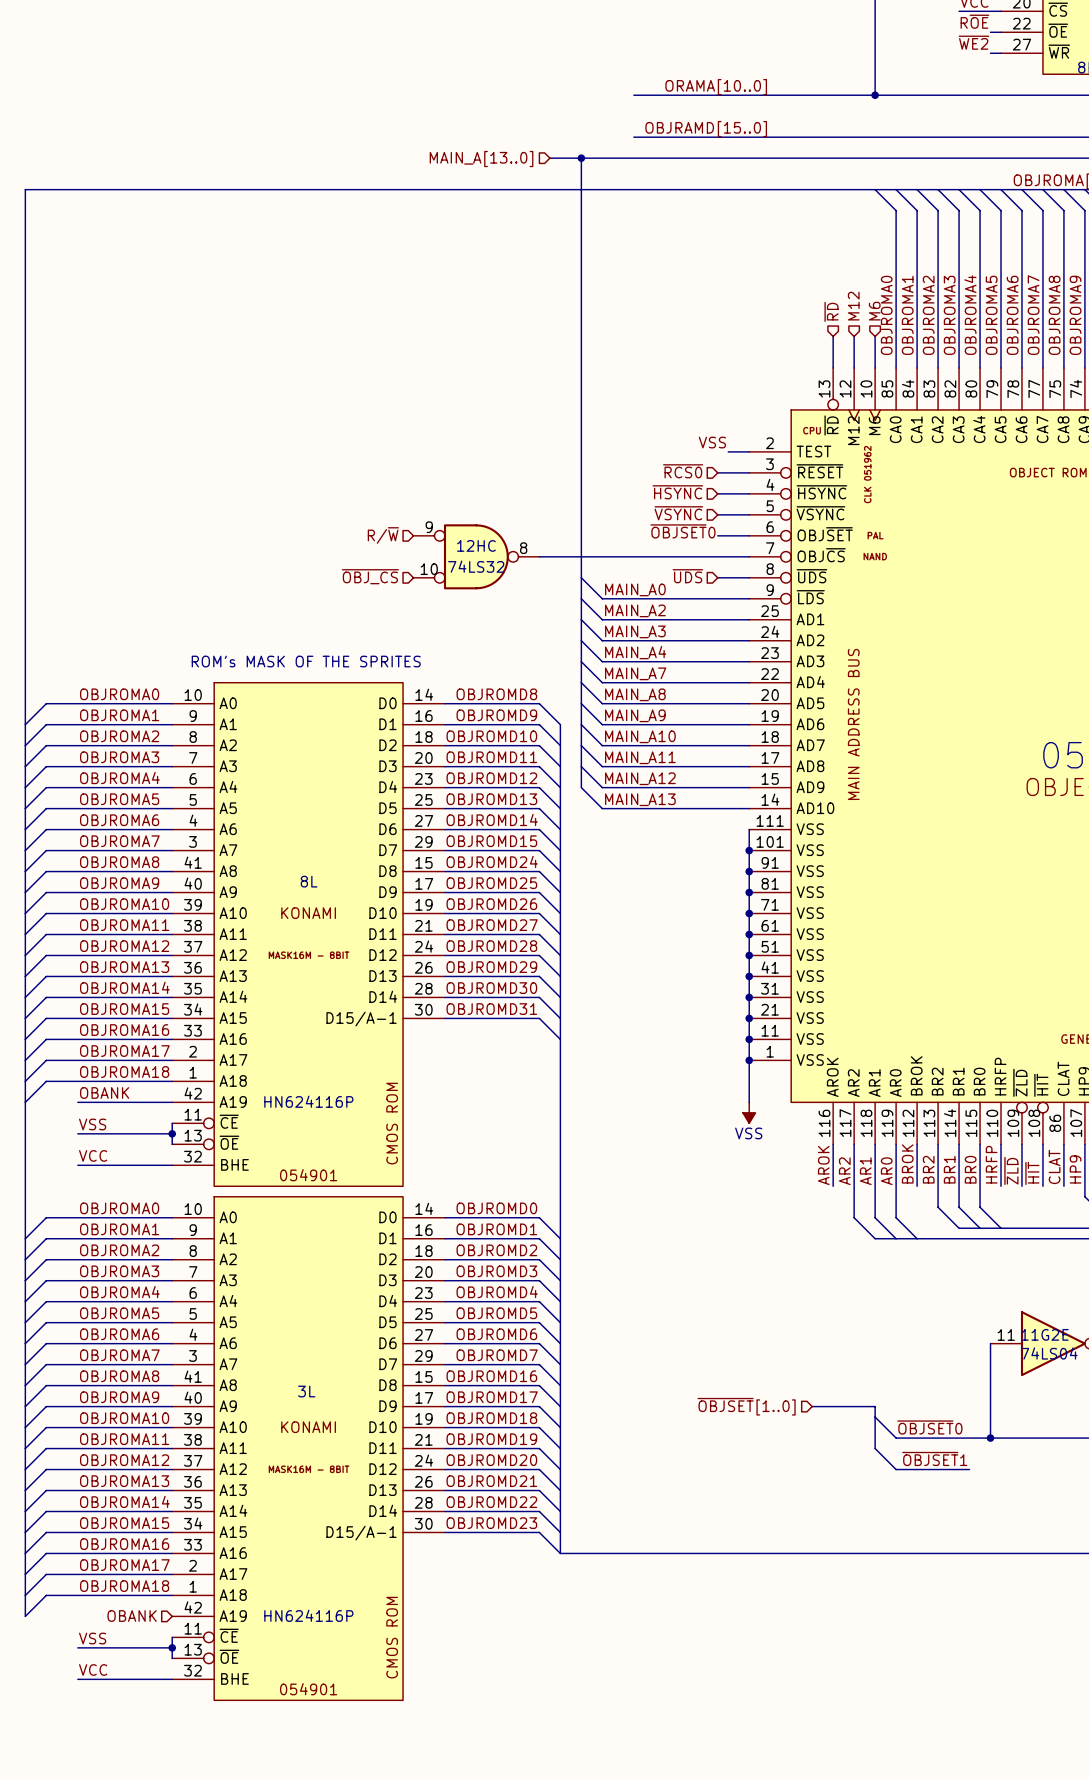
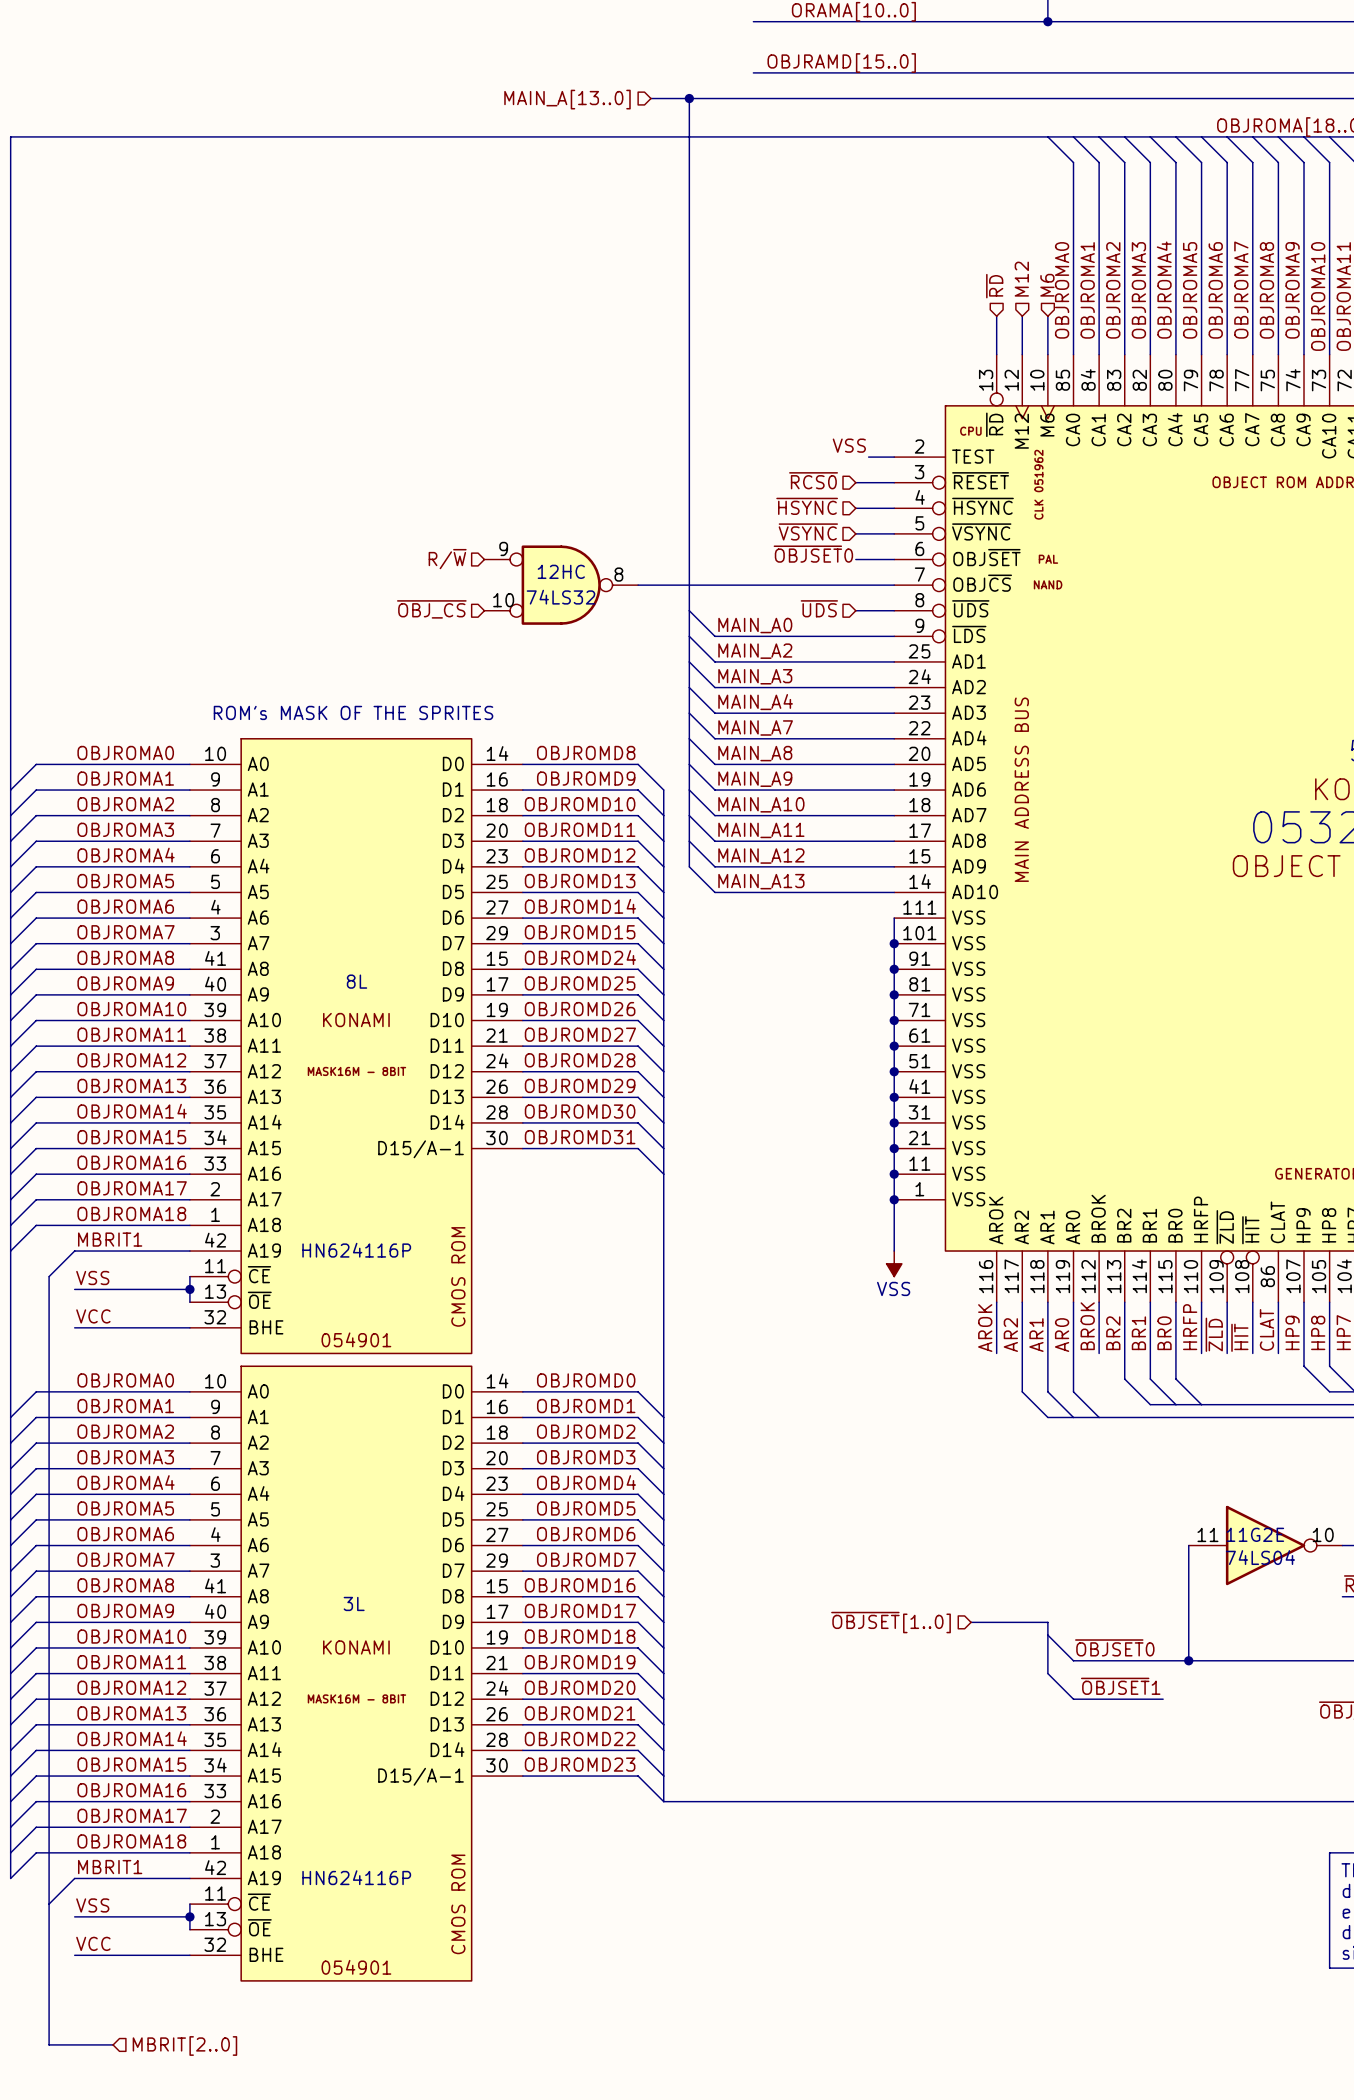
label: OBANK (104, 1092) -> MBRIT1 (110, 1239)
wire: none -> (74, 1251) (49, 1276)
bus: none -> (49, 1276) (49, 2044) (113, 2044)
label: none -> MBRIT1 (110, 1867)
hierarchical label: OBANK (132, 1616) -> none
wire: none -> (189, 1878) (74, 1878) (49, 1904)
hierarchical label: none -> MBRIT[2..0] (184, 2045)

